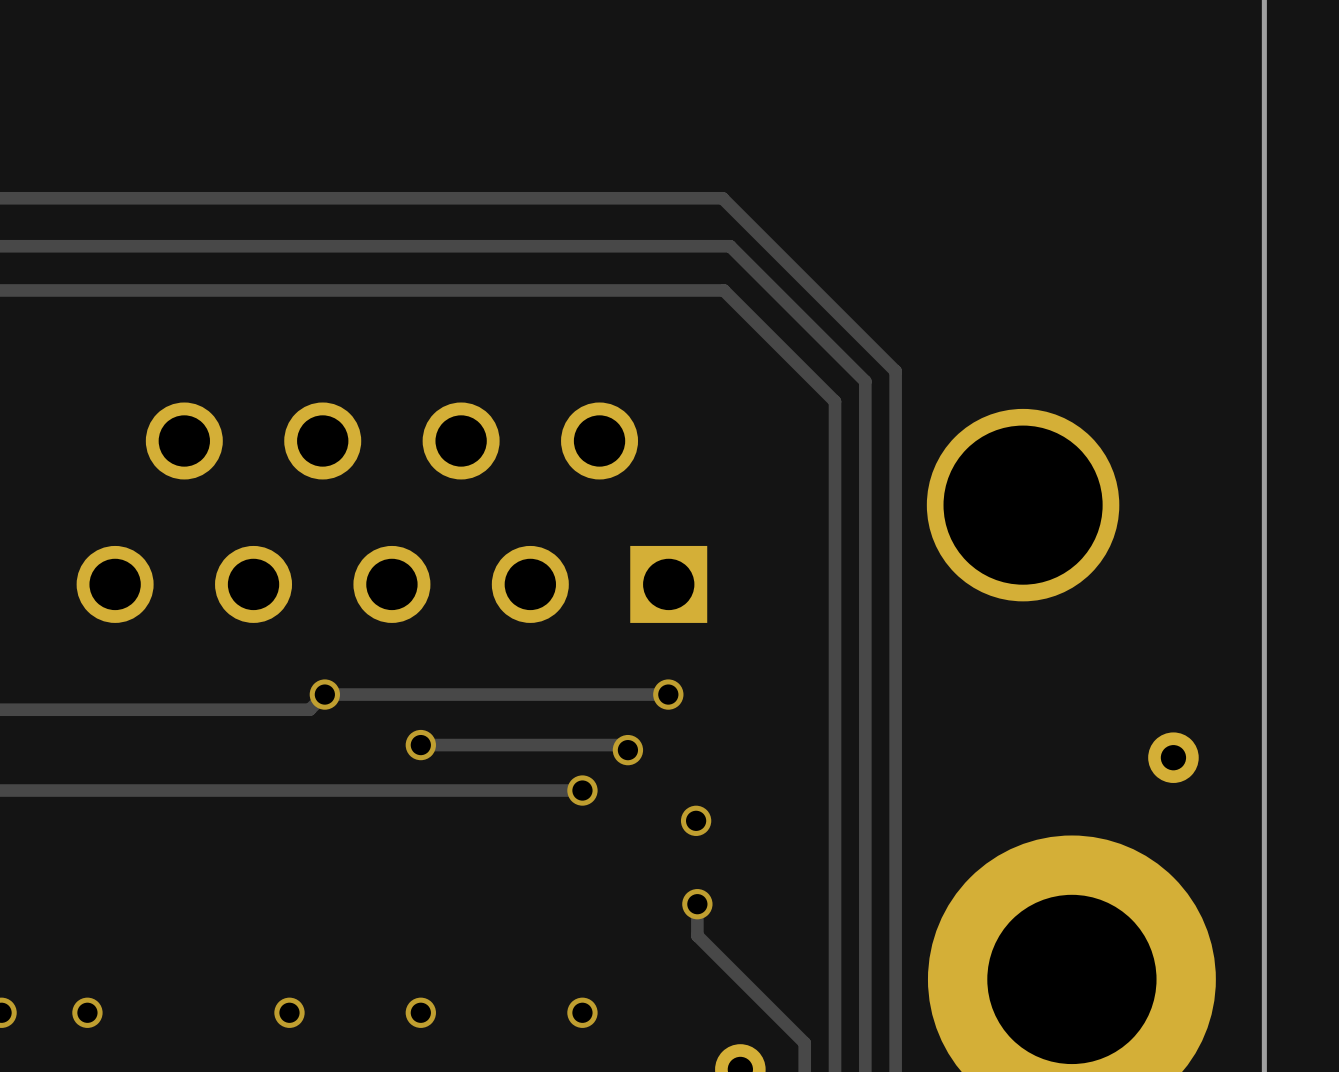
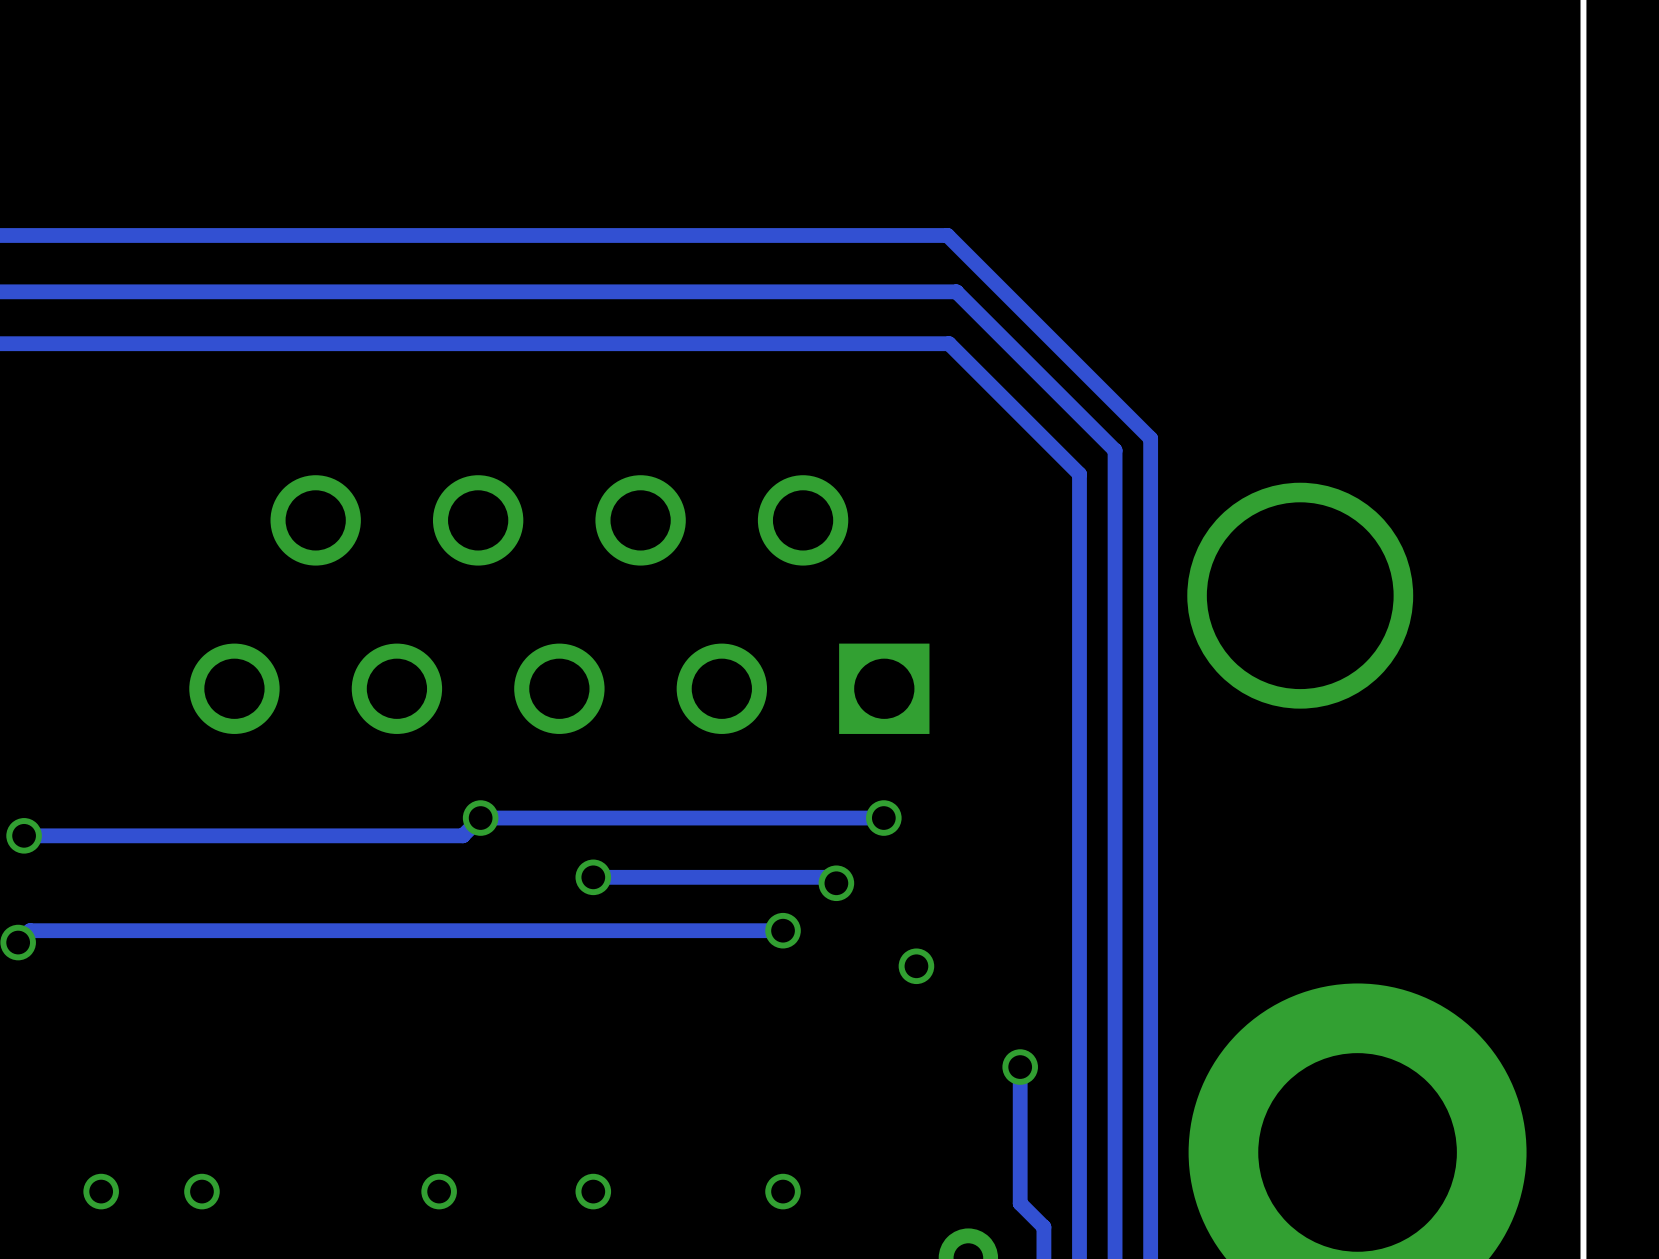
part: (1173, 757) -> none
track: (697, 904) (697, 935) (784, 1022) -> (1020, 1067) (1020, 1203)
via position: (697, 904) -> (1020, 1067)

